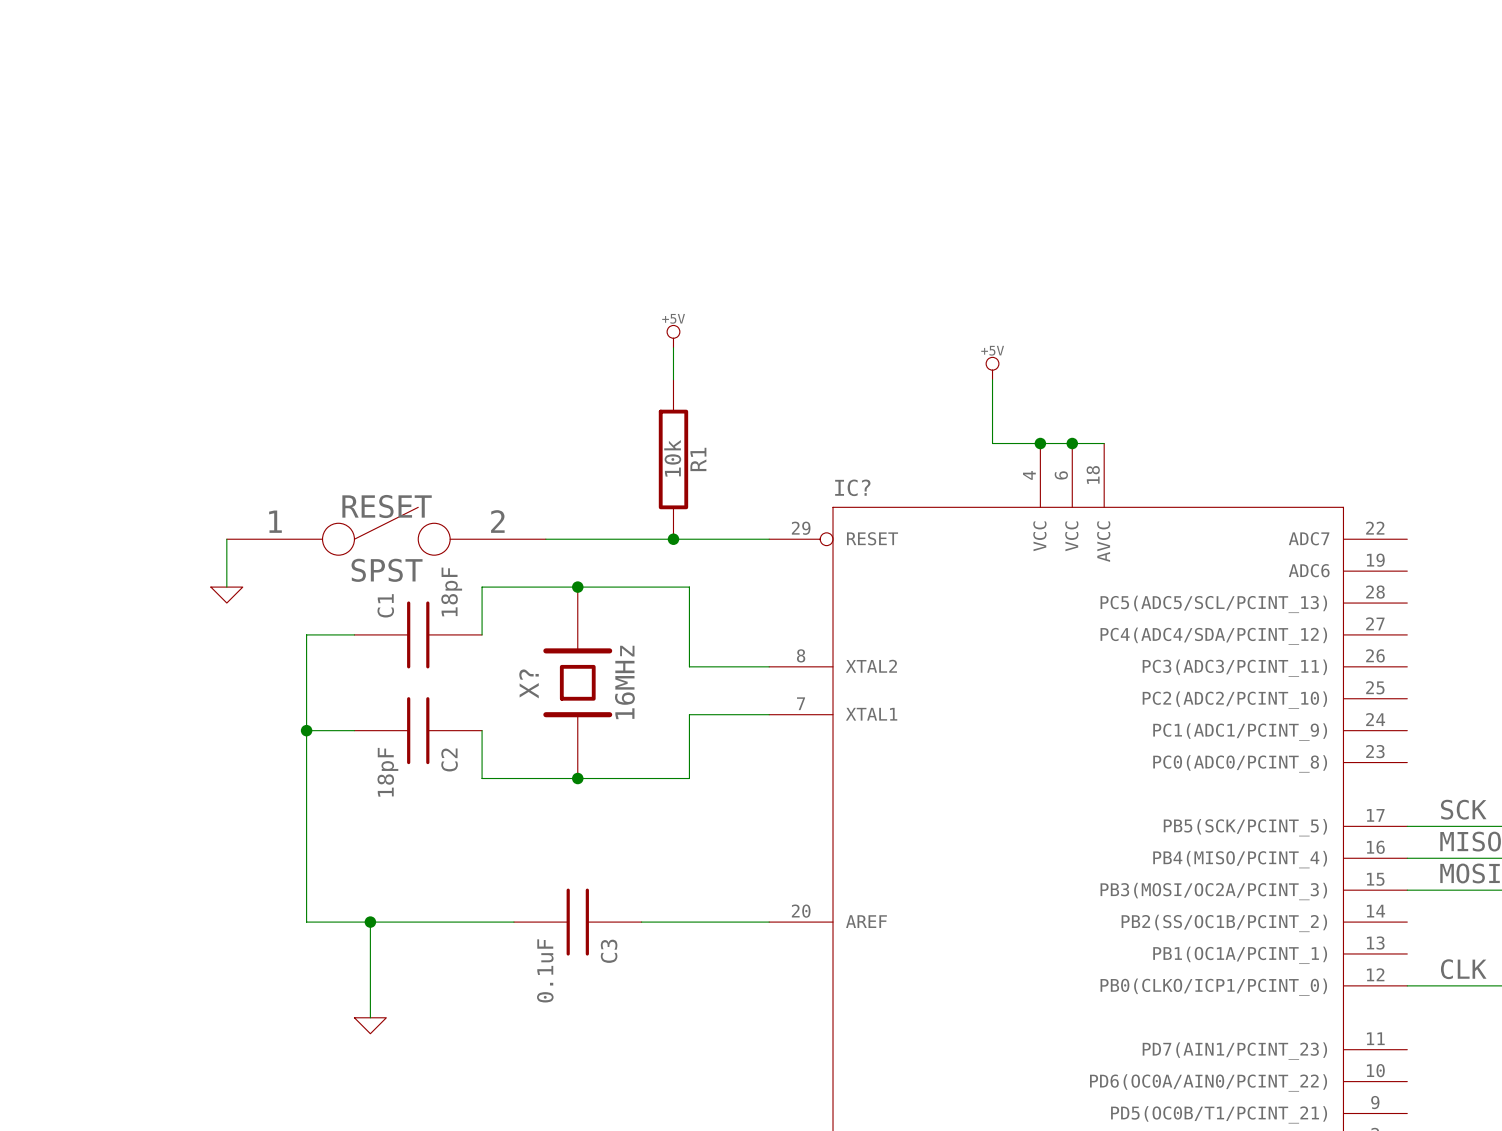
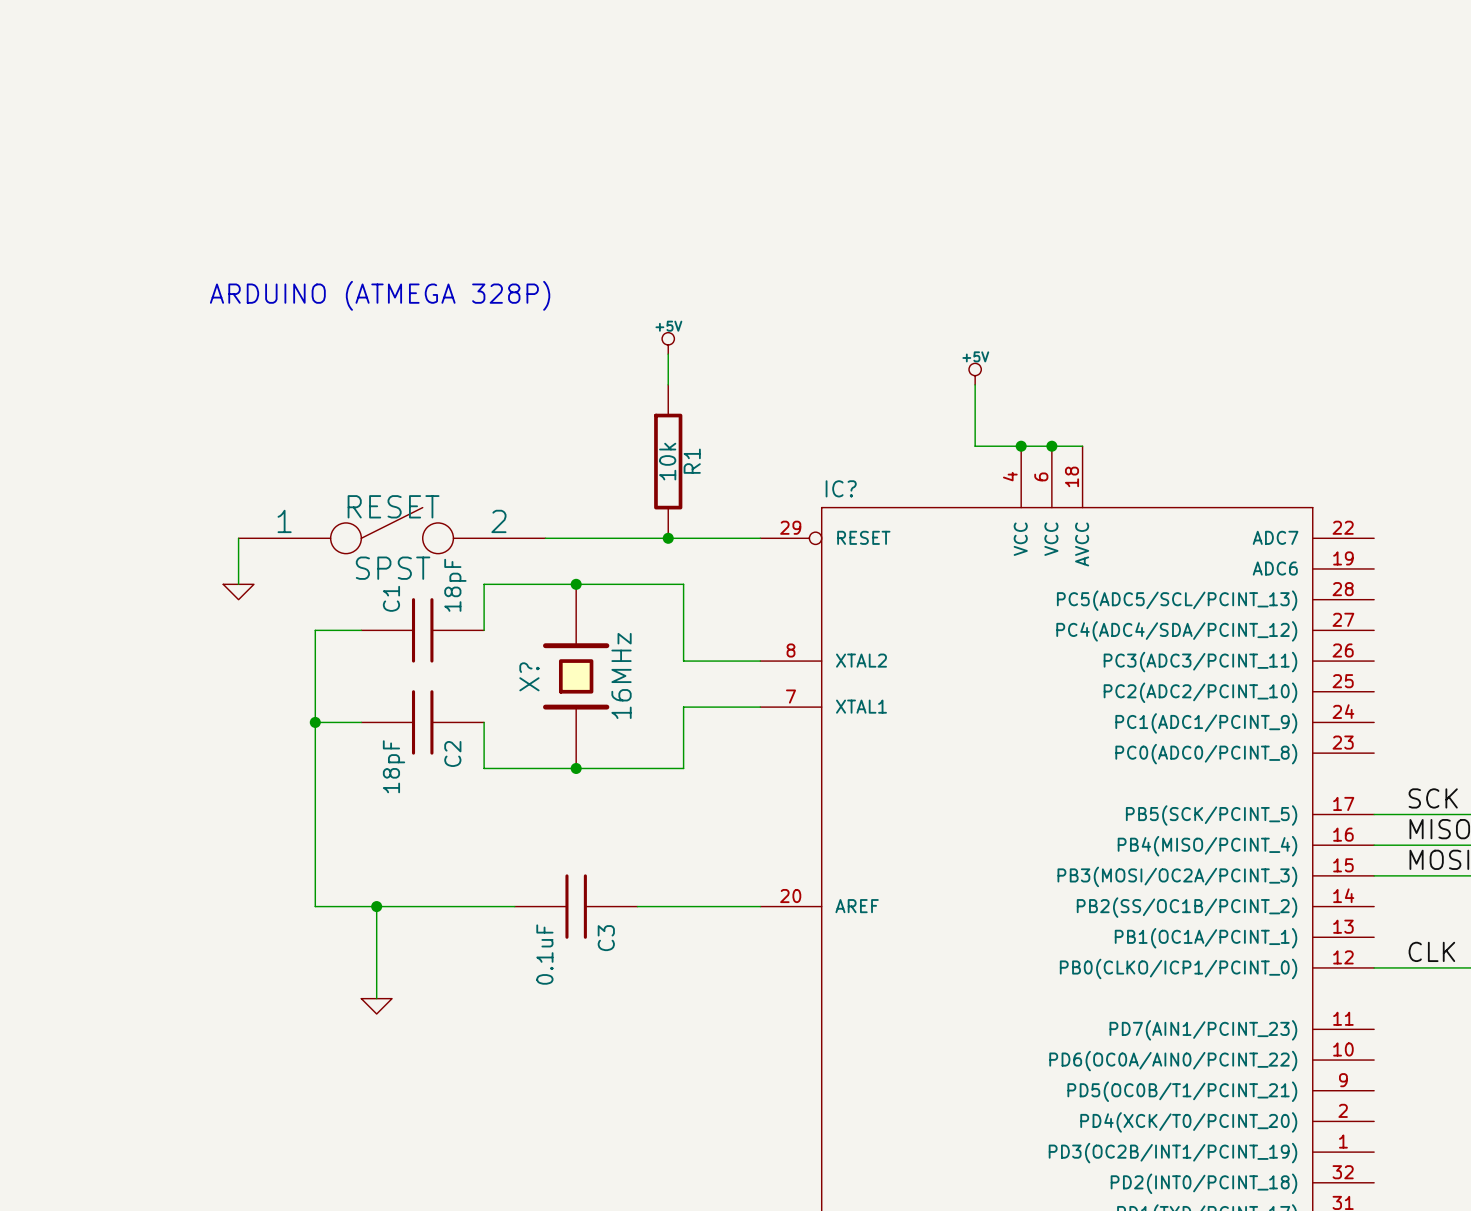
text: none -> ARDUINO (ATMEGA 328P) (380, 295)

